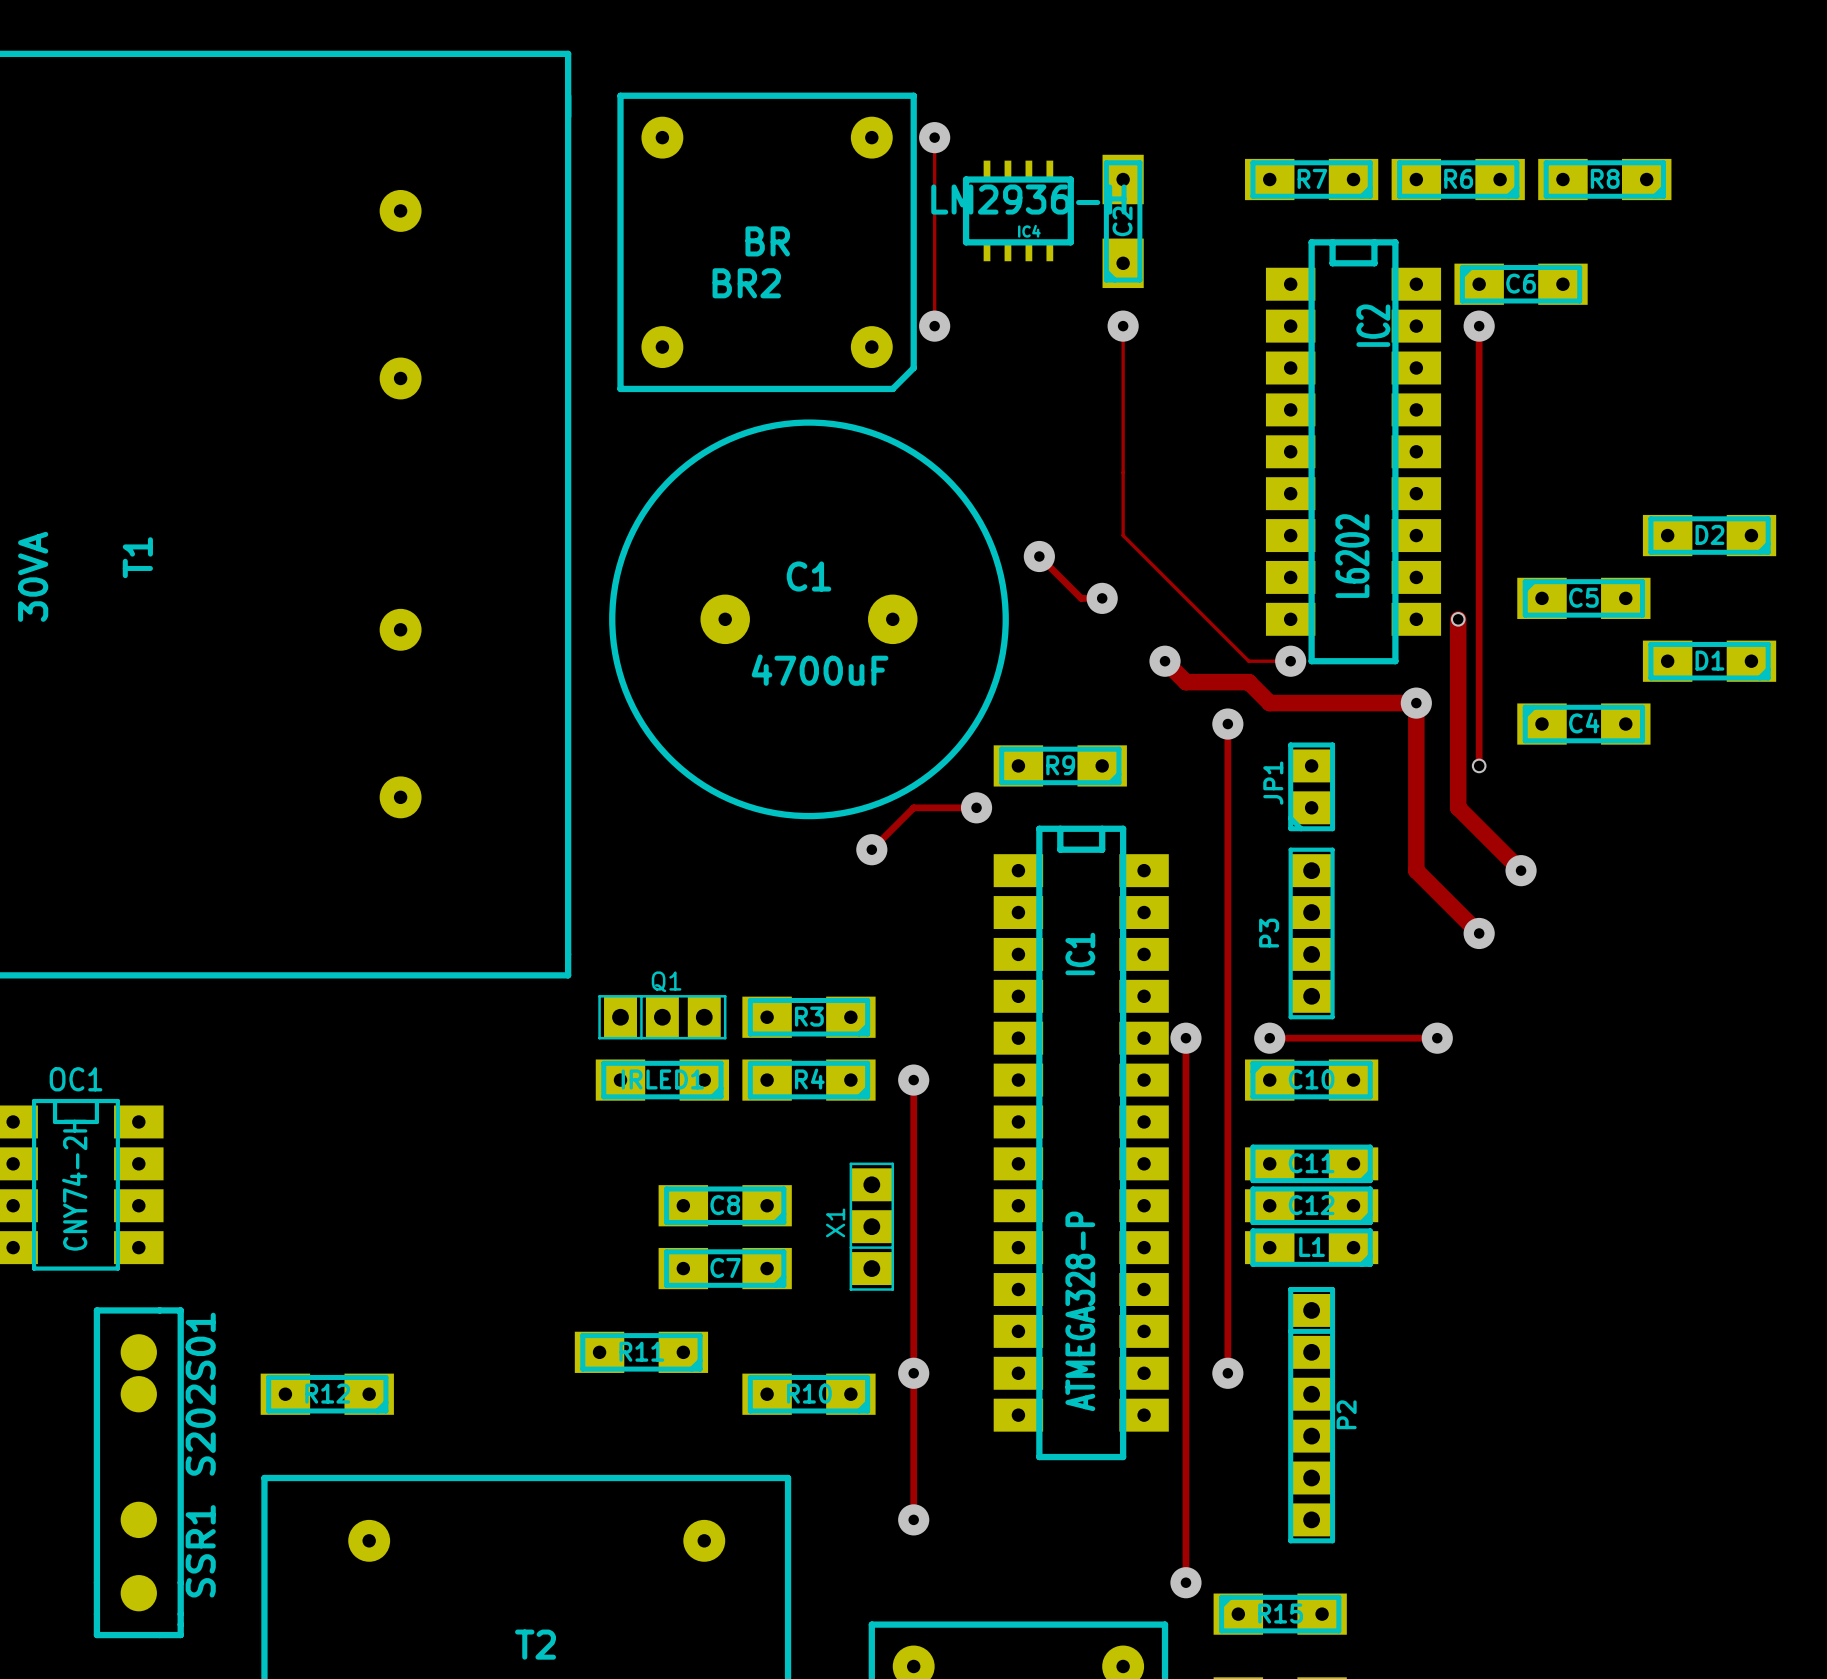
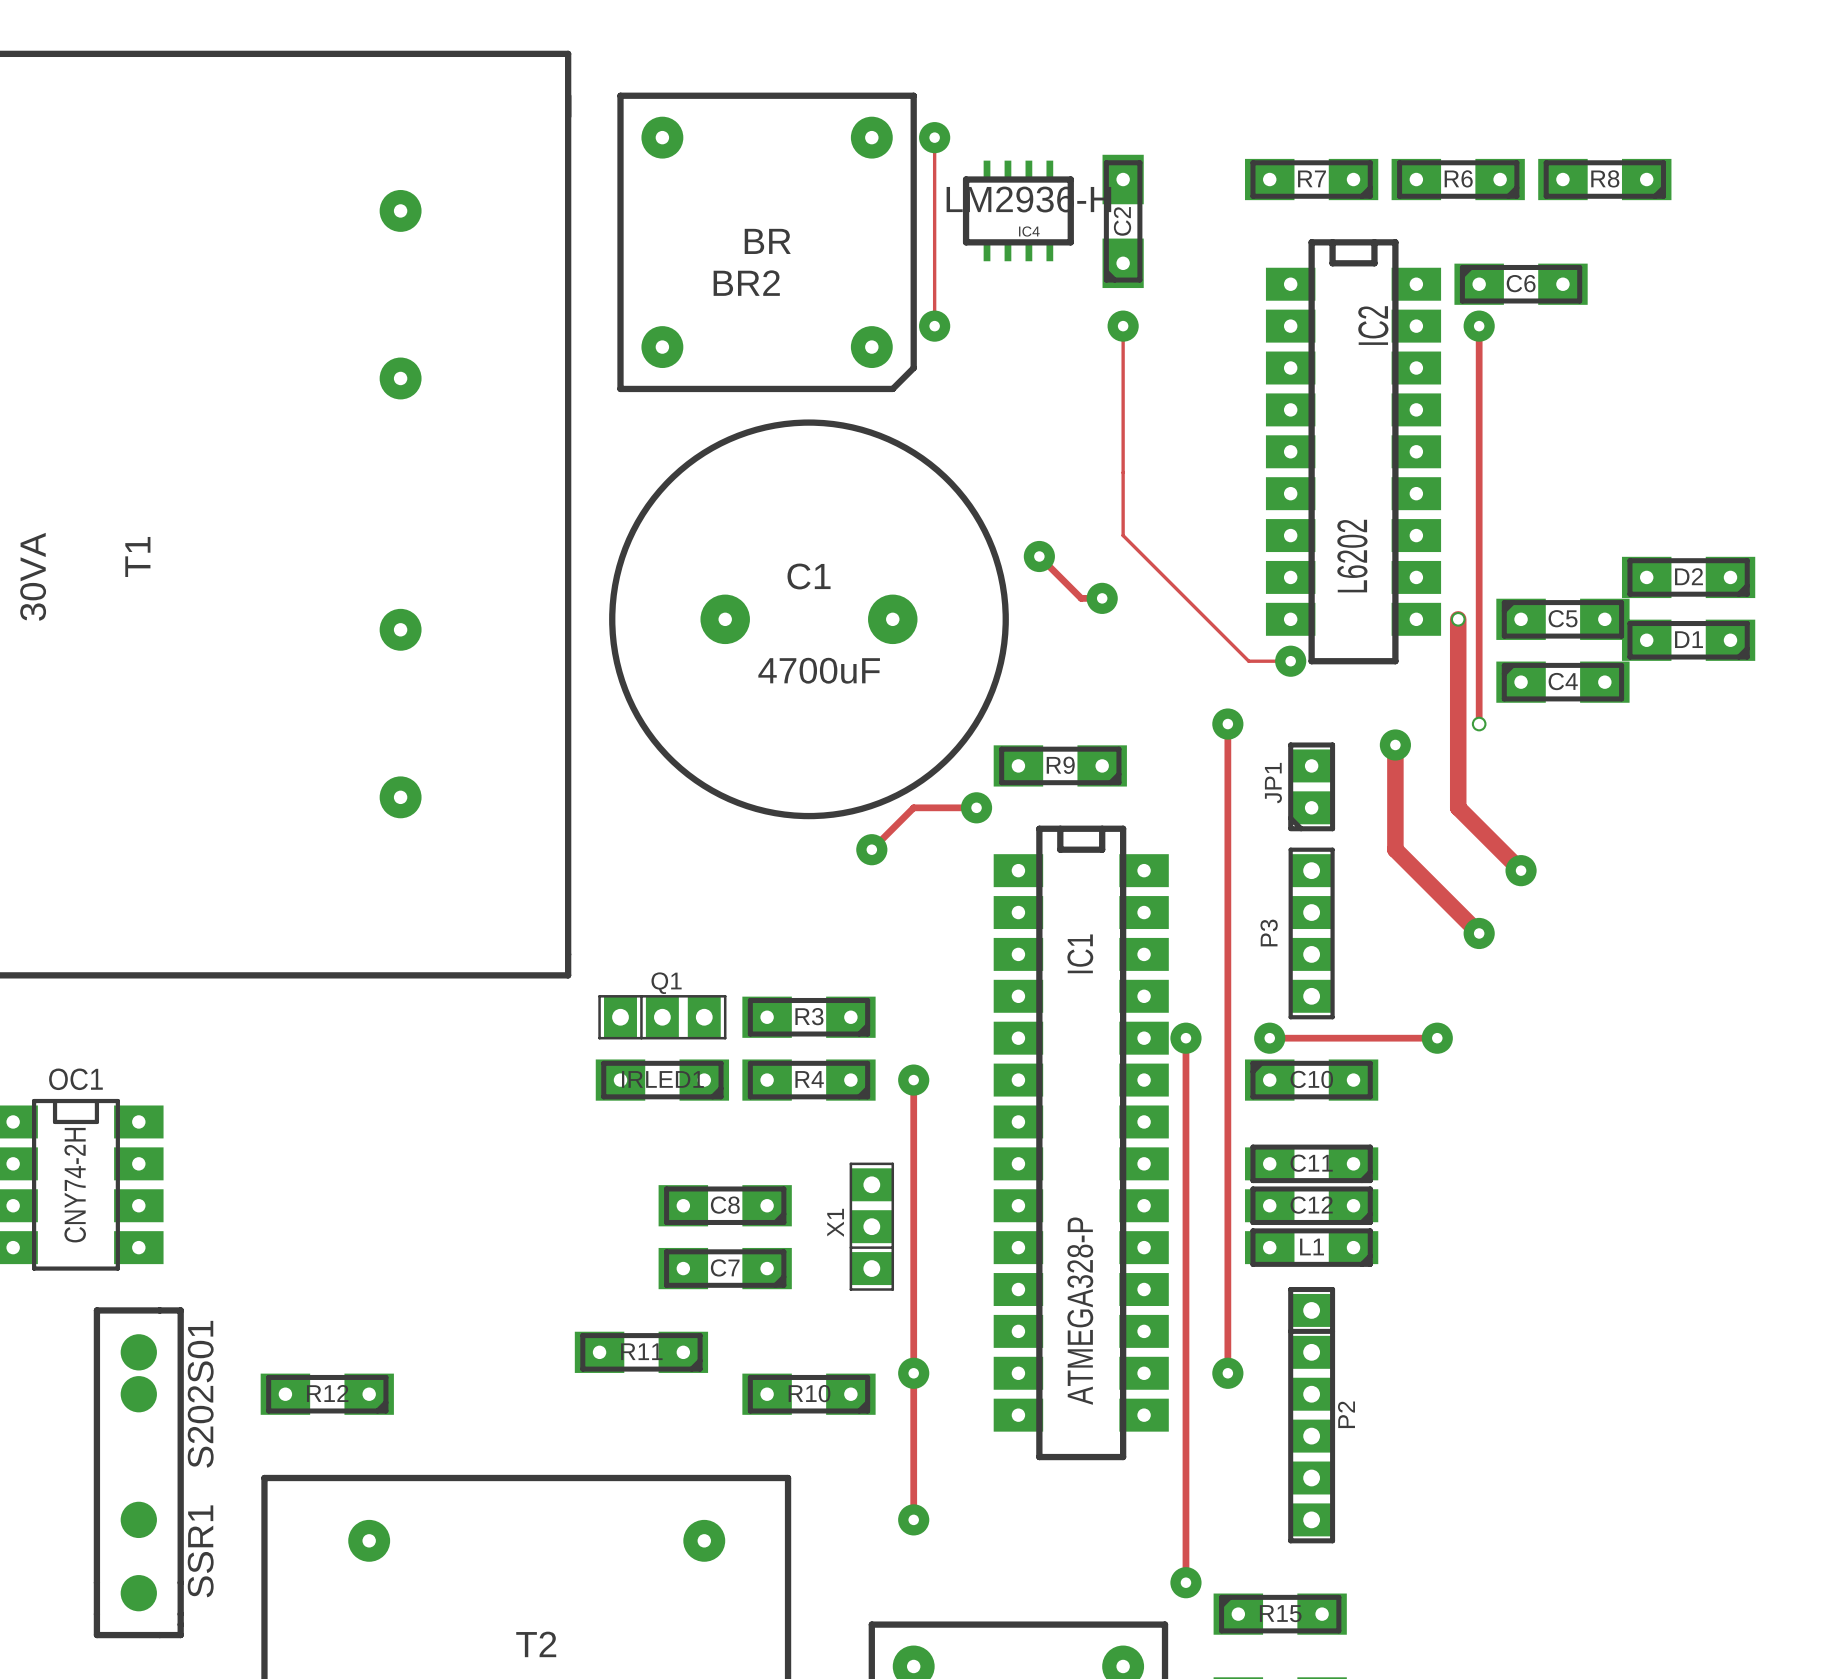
D2 position: (1709, 535) -> (1688, 577)
C5 position: (1583, 598) -> (1562, 619)
track: (1165, 661) (1185, 682) (1248, 682) (1269, 703) (1416, 703) (1416, 870) -> (1395, 744) (1395, 849) (1416, 870)
via: (1165, 661) -> none
D1 position: (1709, 661) -> (1688, 640)
via position: (1416, 703) -> (1395, 744)
track: (1479, 724) (1479, 765) -> none
C4 position: (1583, 724) -> (1562, 682)
via position: (1479, 765) -> (1479, 724)

